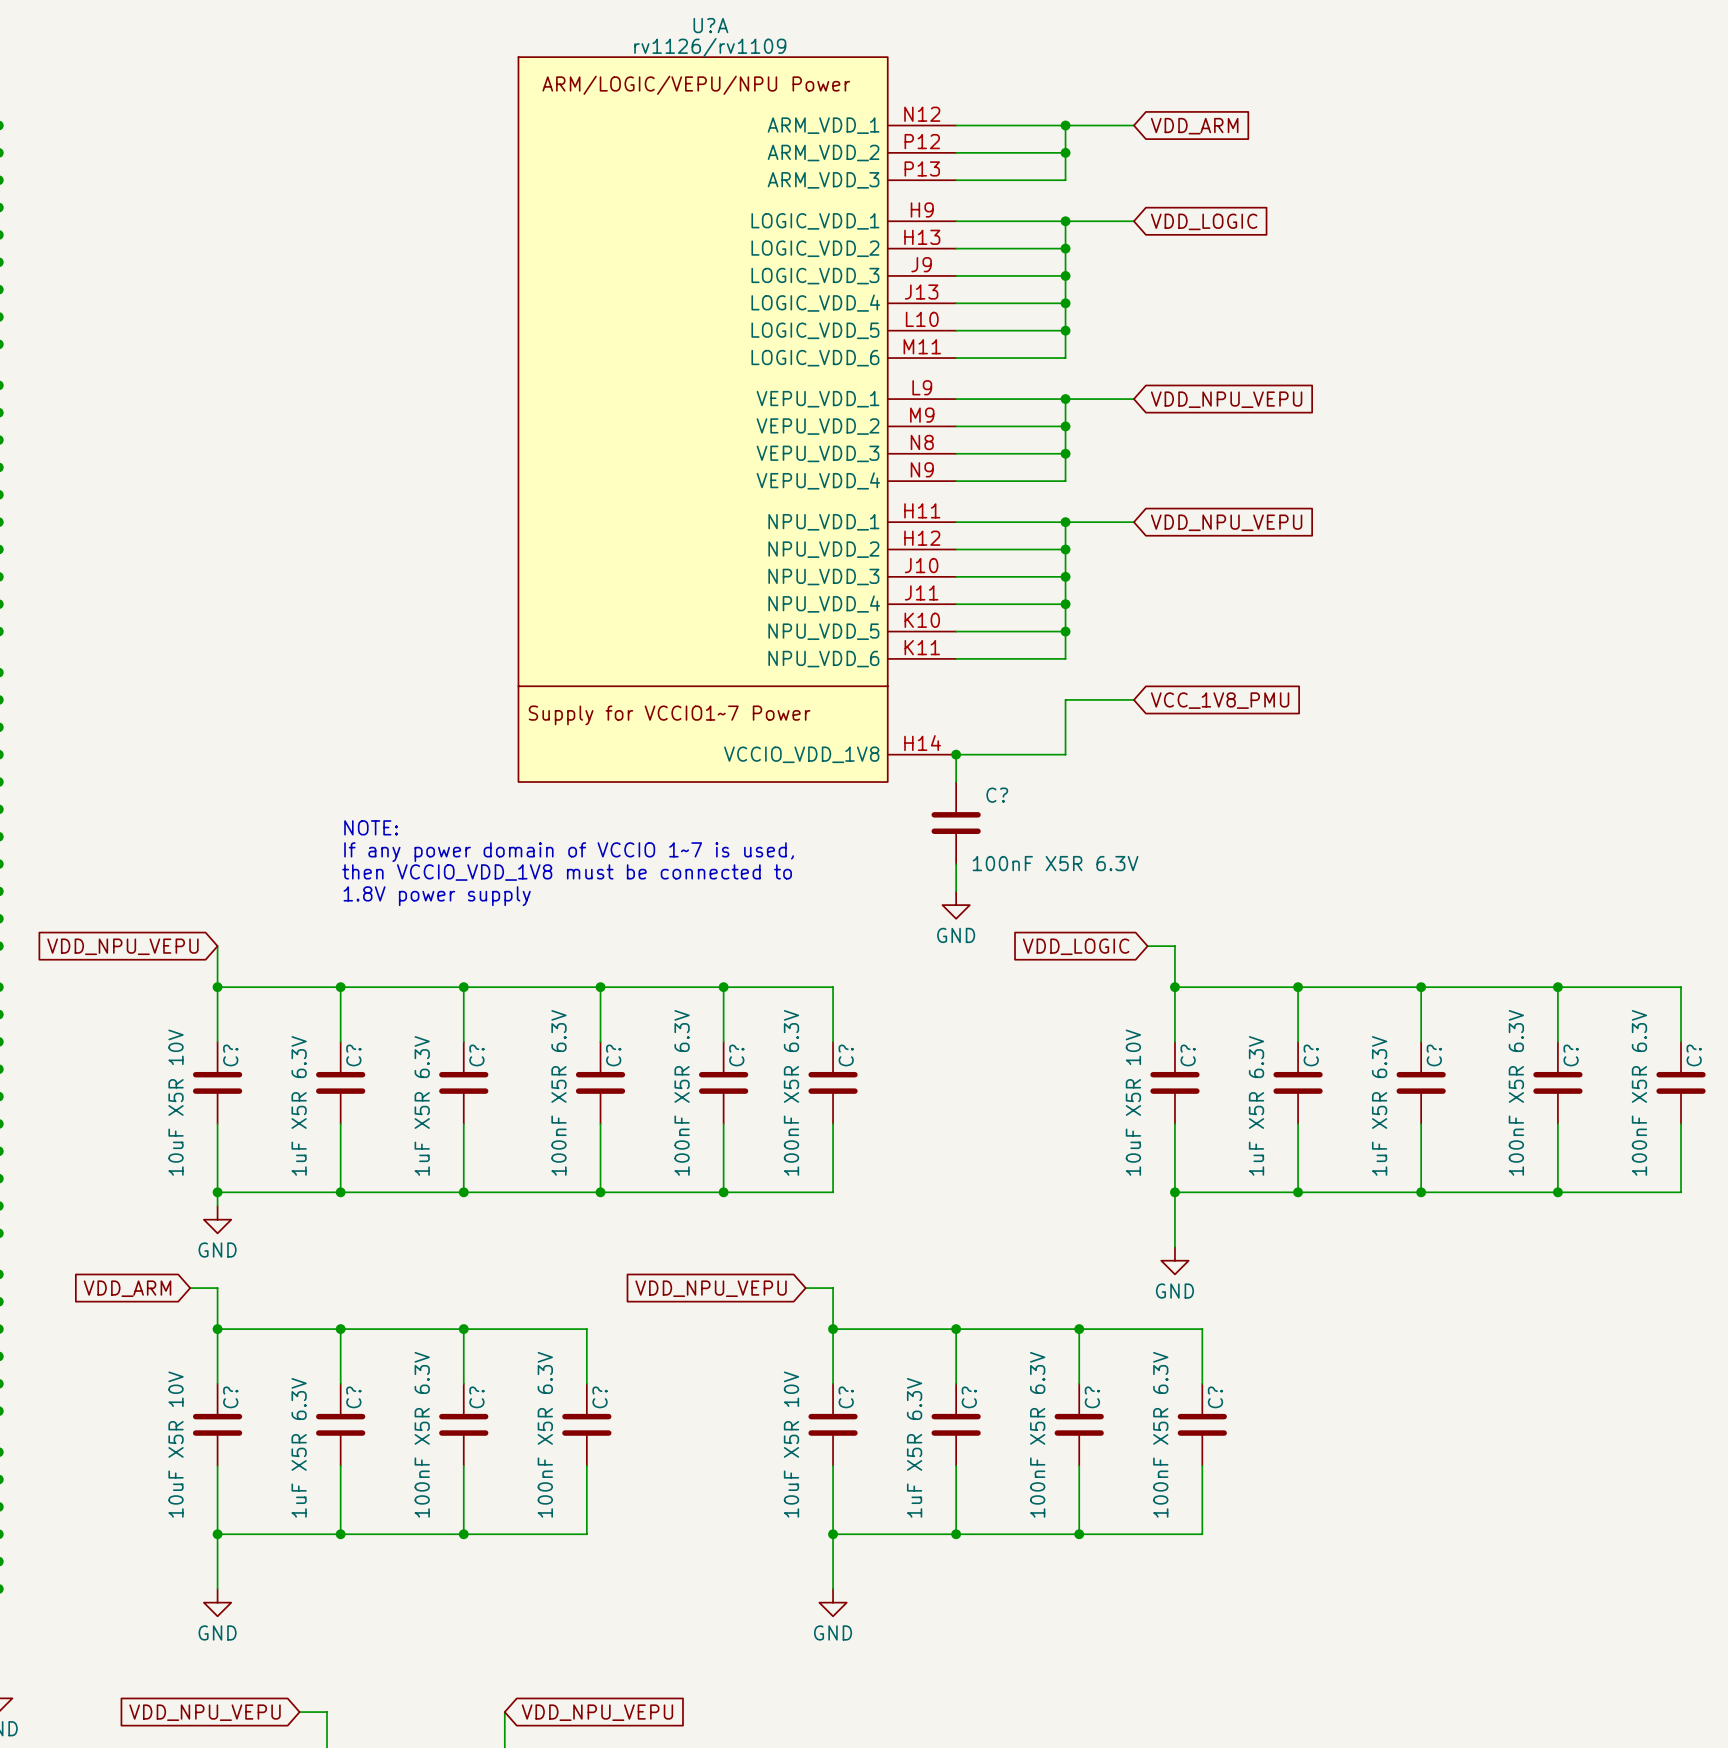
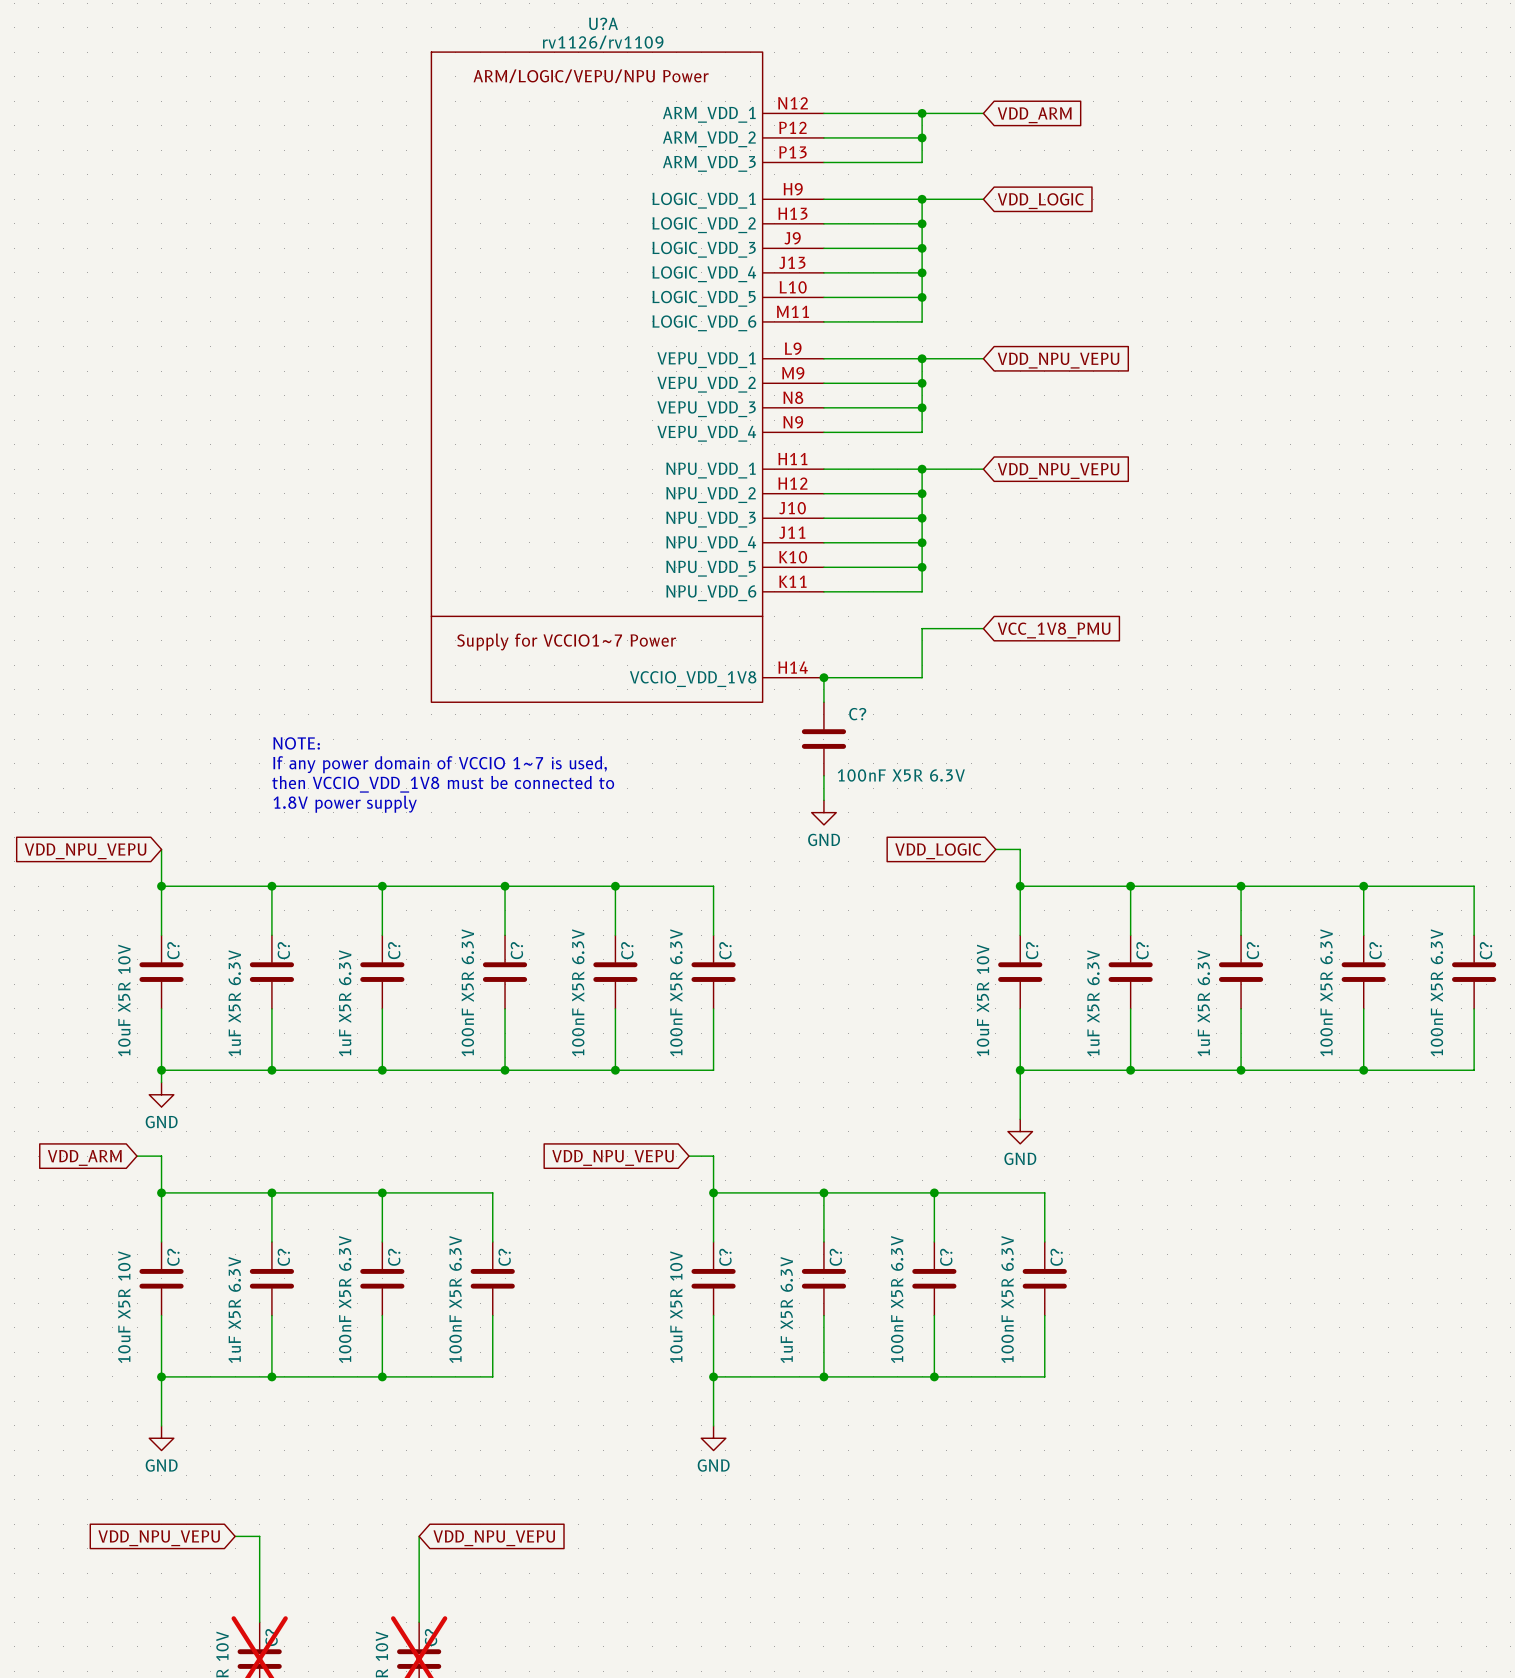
U?A symbol: [518, 57, 957, 783] -> [431, 52, 824, 703]

